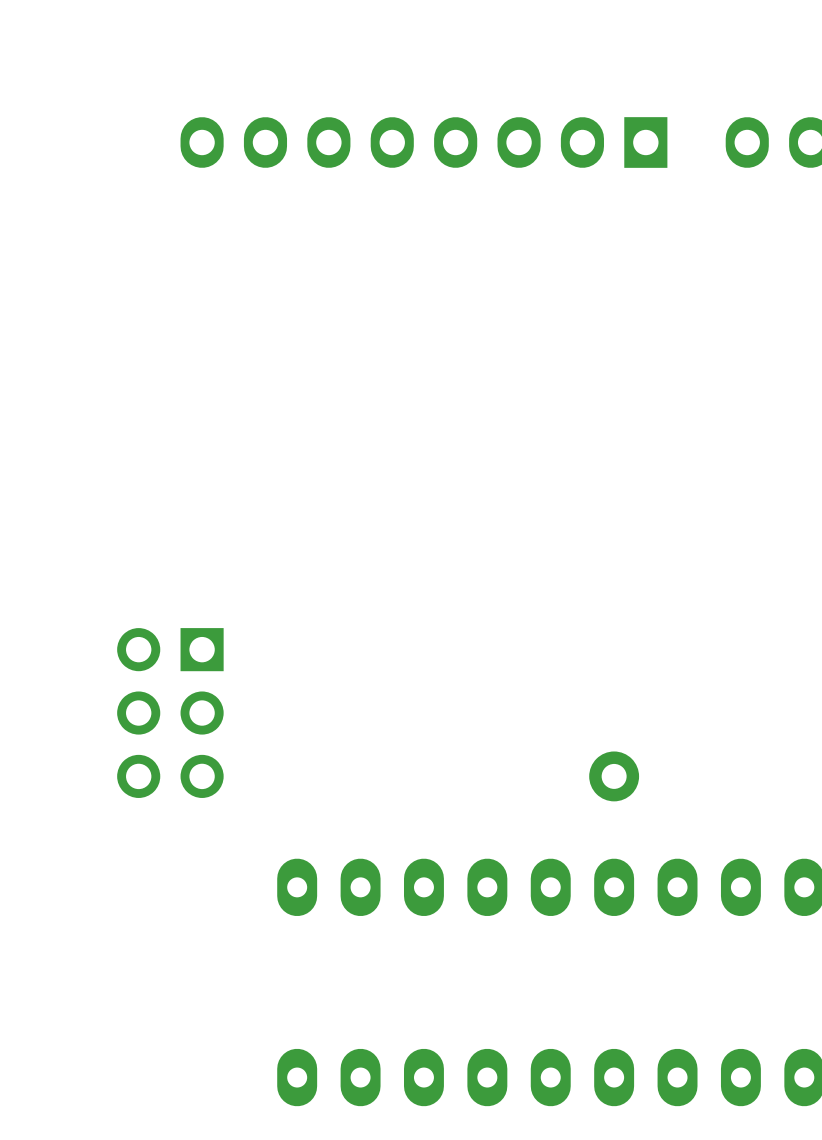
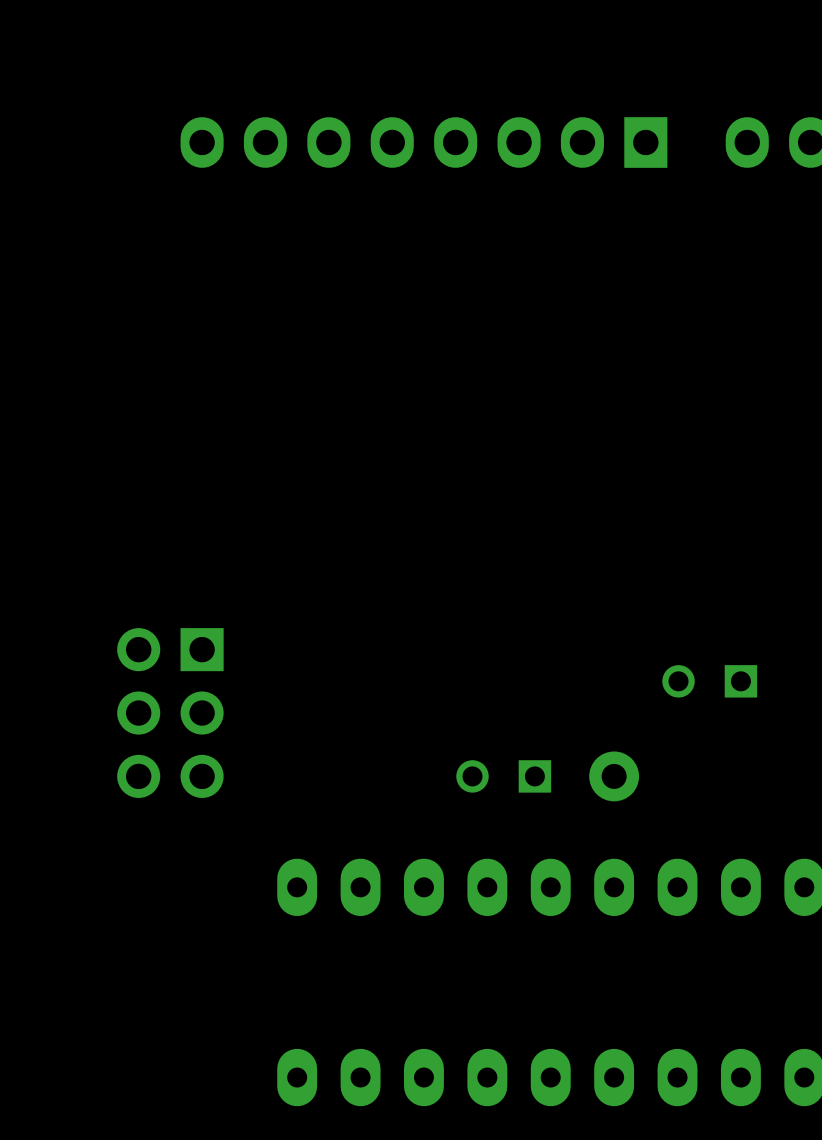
part: none -> (709, 681)
part: none -> (503, 776)

